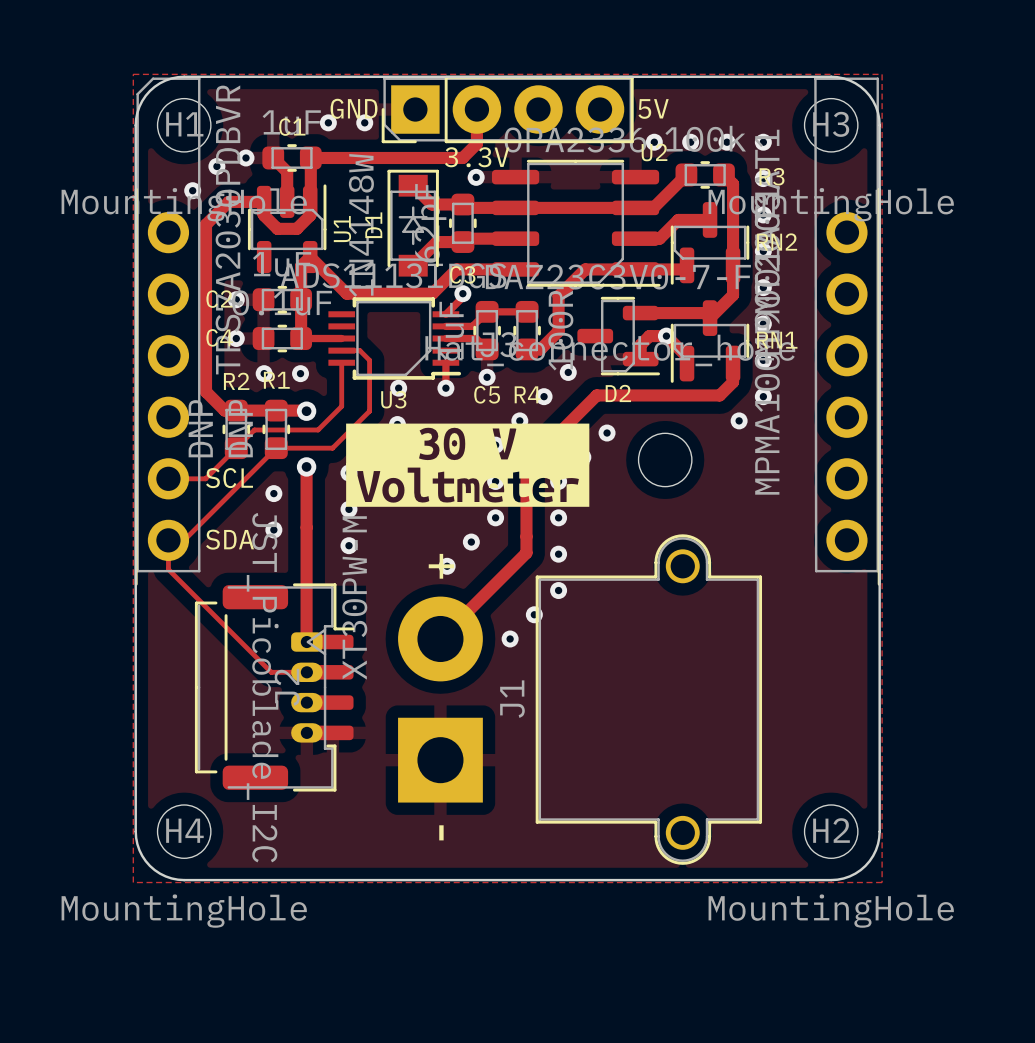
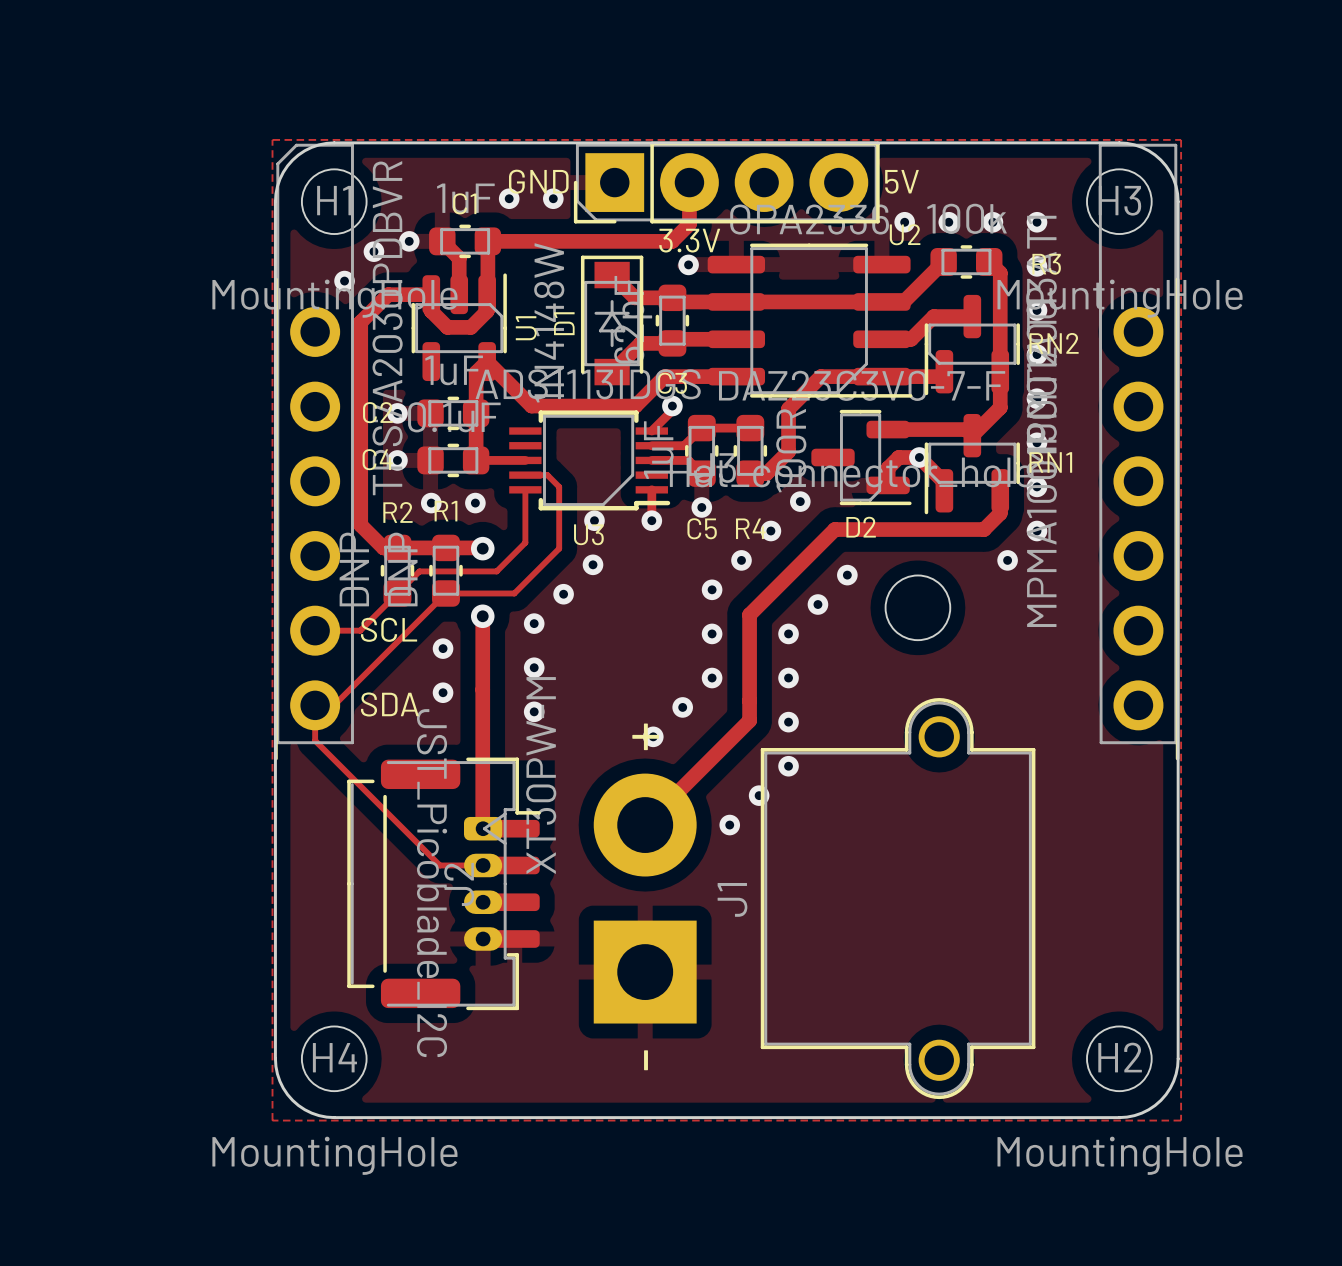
drawing: [346, 423, 590, 507] -> none

